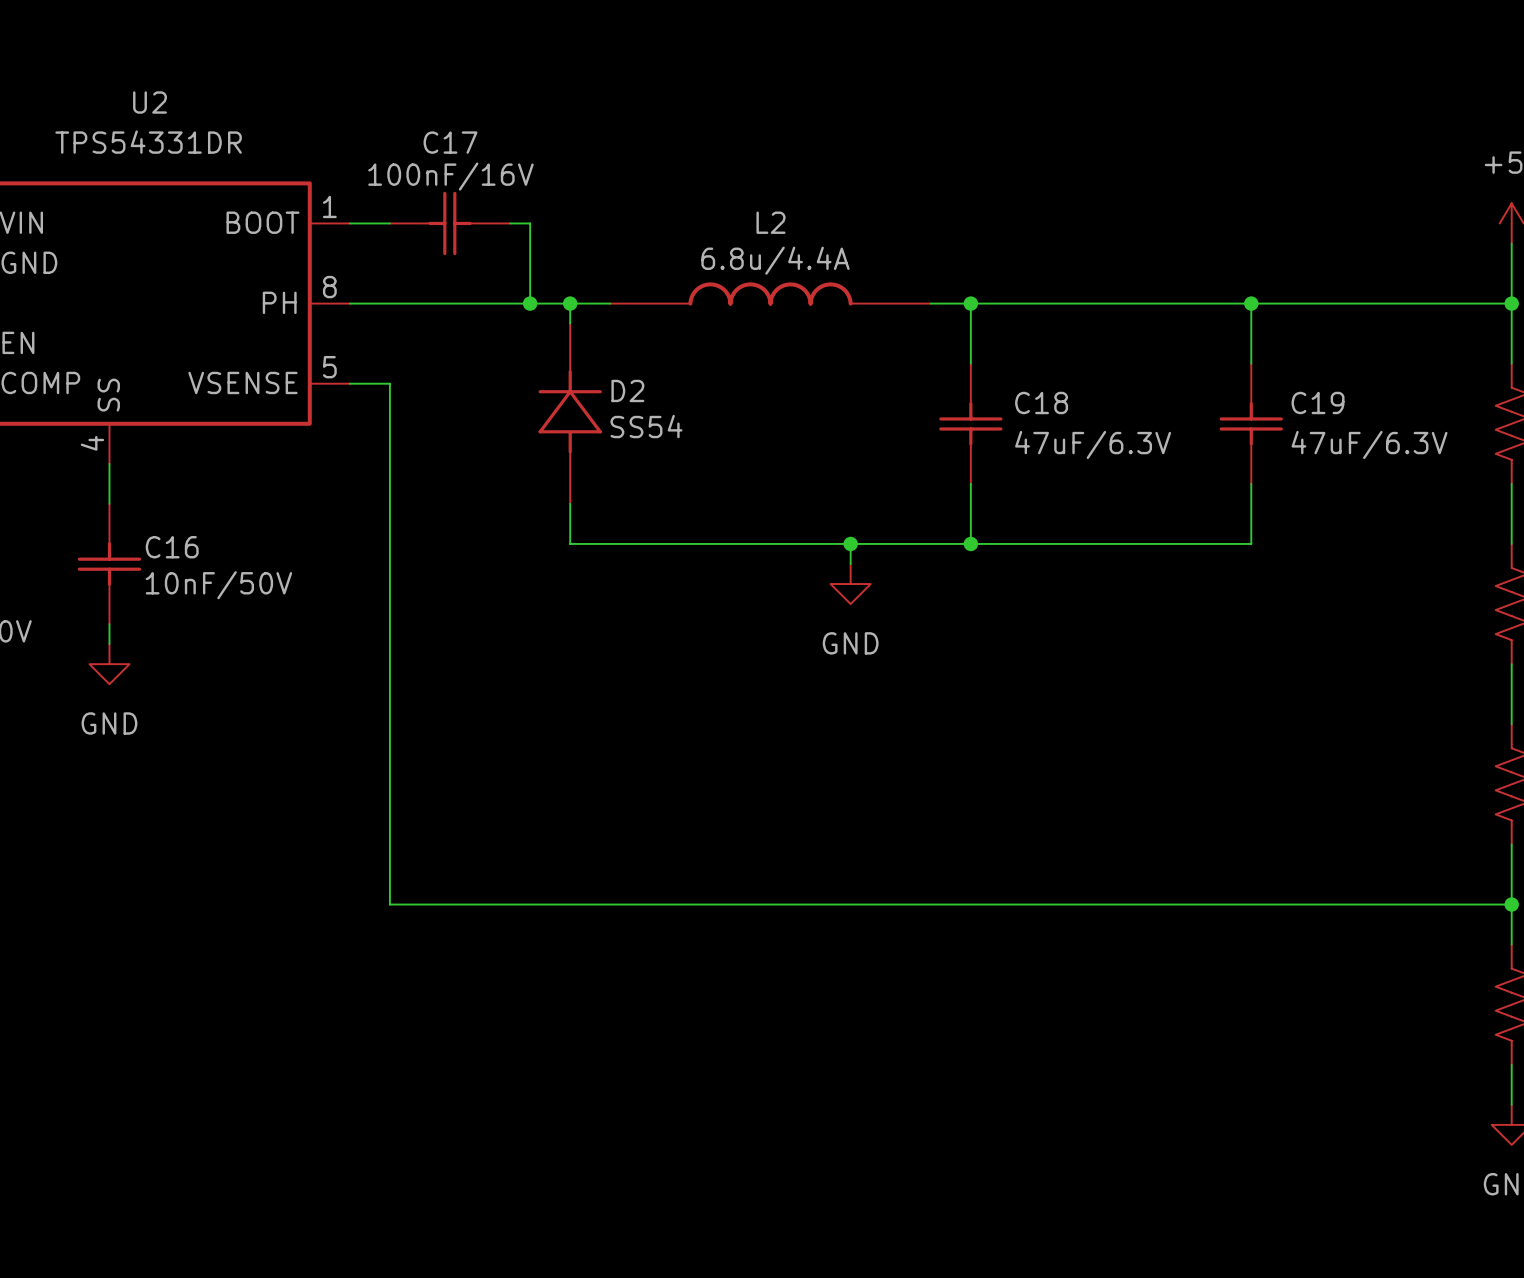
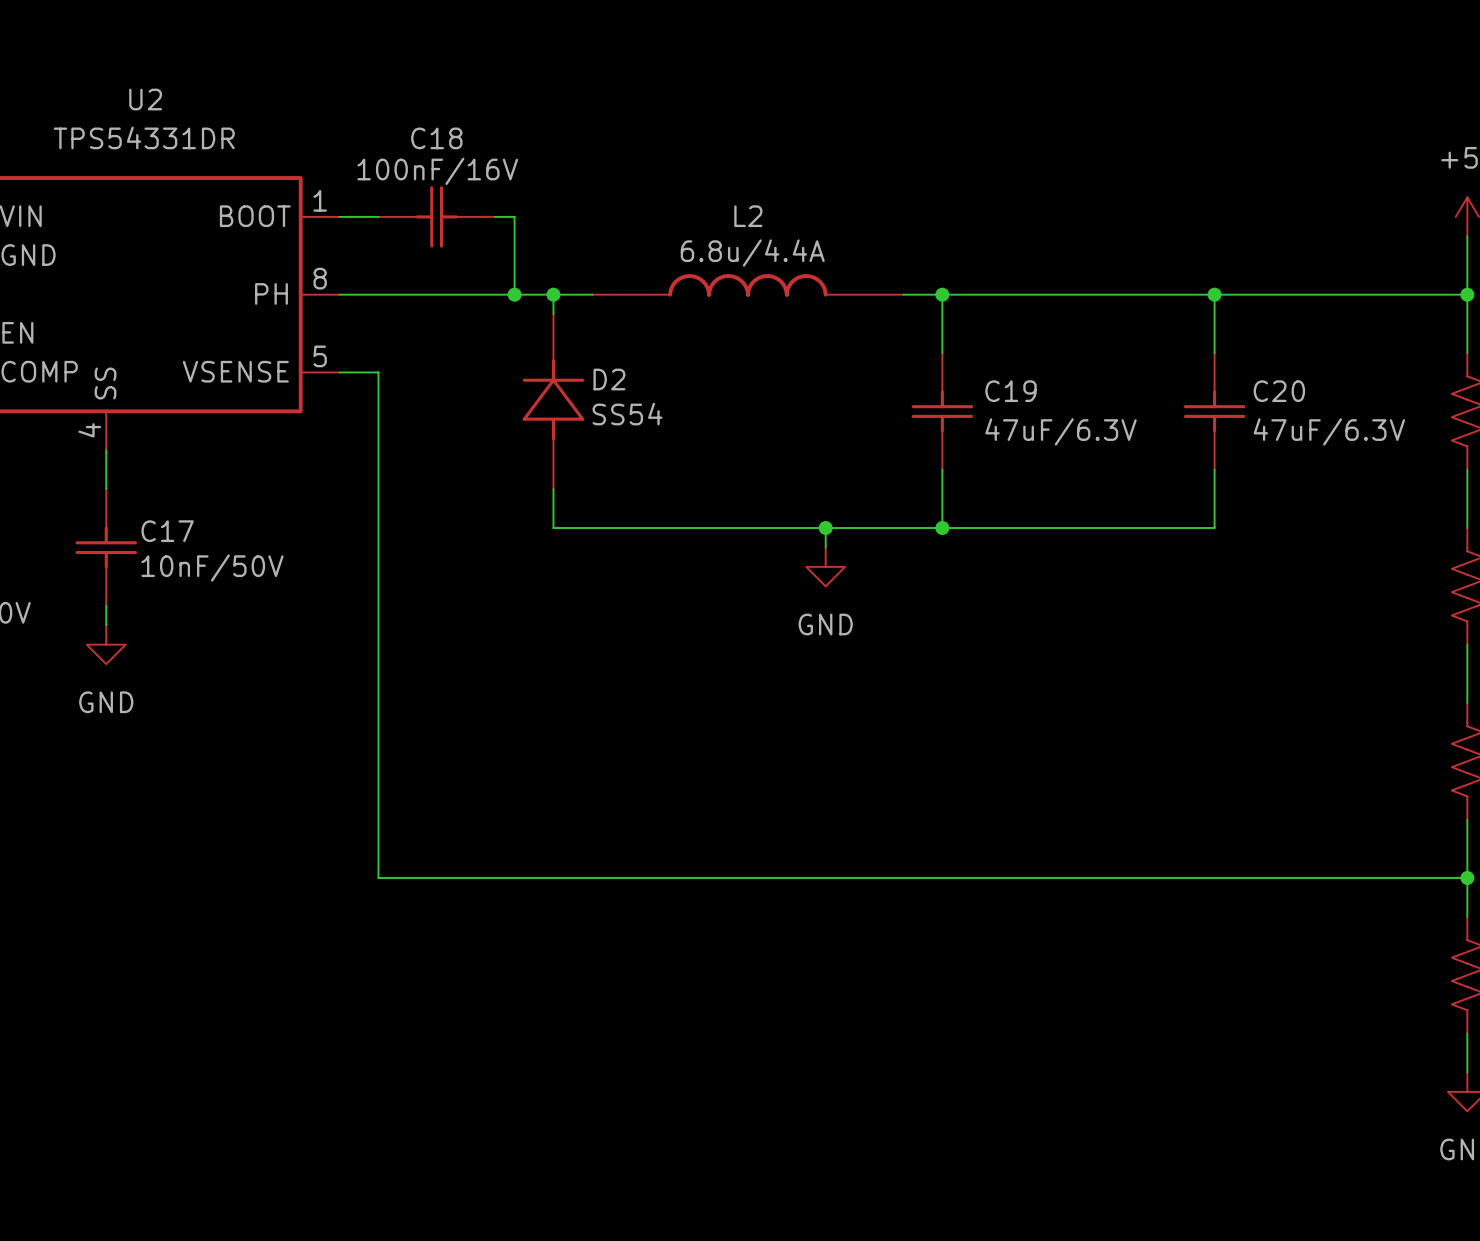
C17 name: C17 (450, 142) -> C18 (436, 138)
C18 name: C18 (1041, 402) -> C19 (1011, 391)
C19 name: C19 (1318, 402) -> C20 (1279, 391)
C16 name: C16 (172, 547) -> C17 (167, 531)

